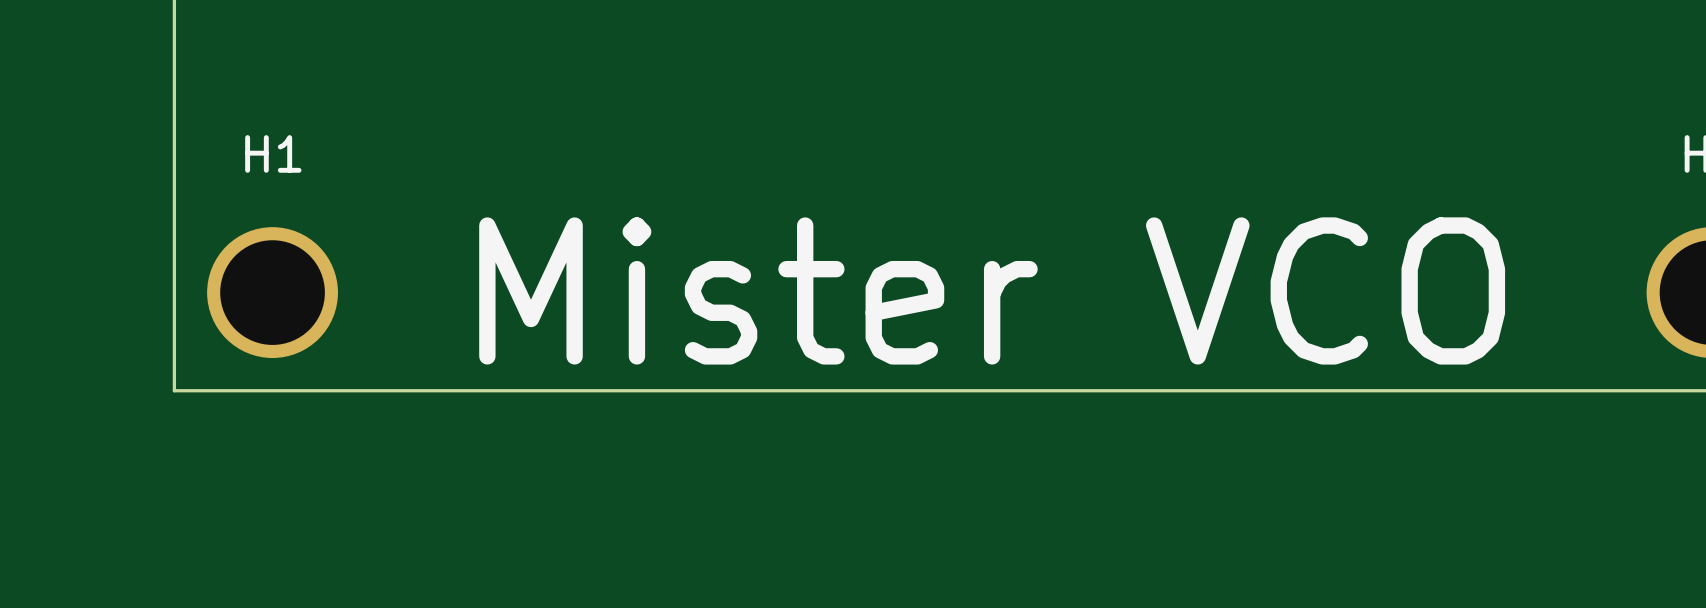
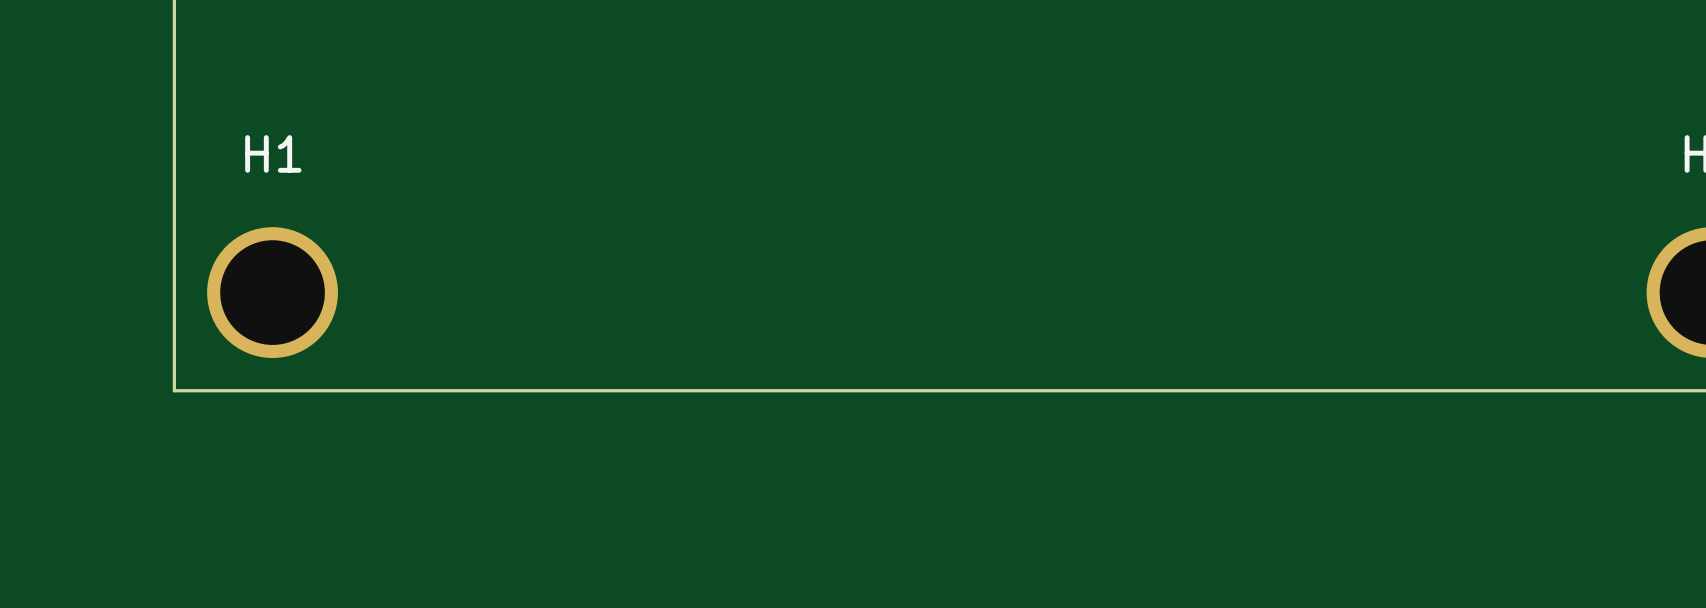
text: Mister VCO (992, 290) -> none

